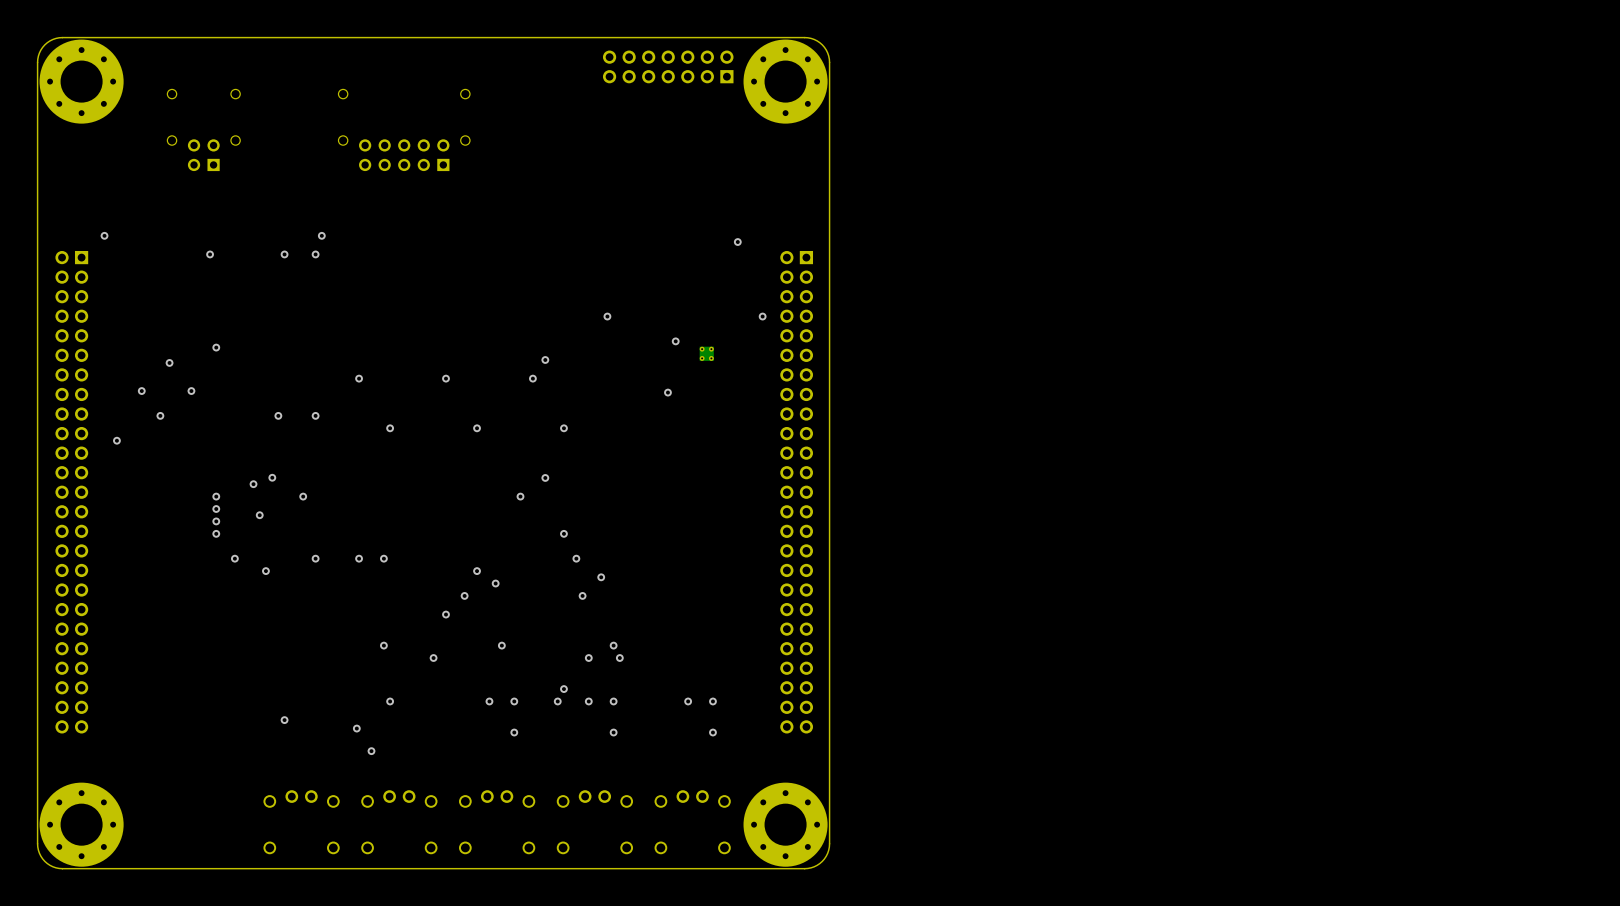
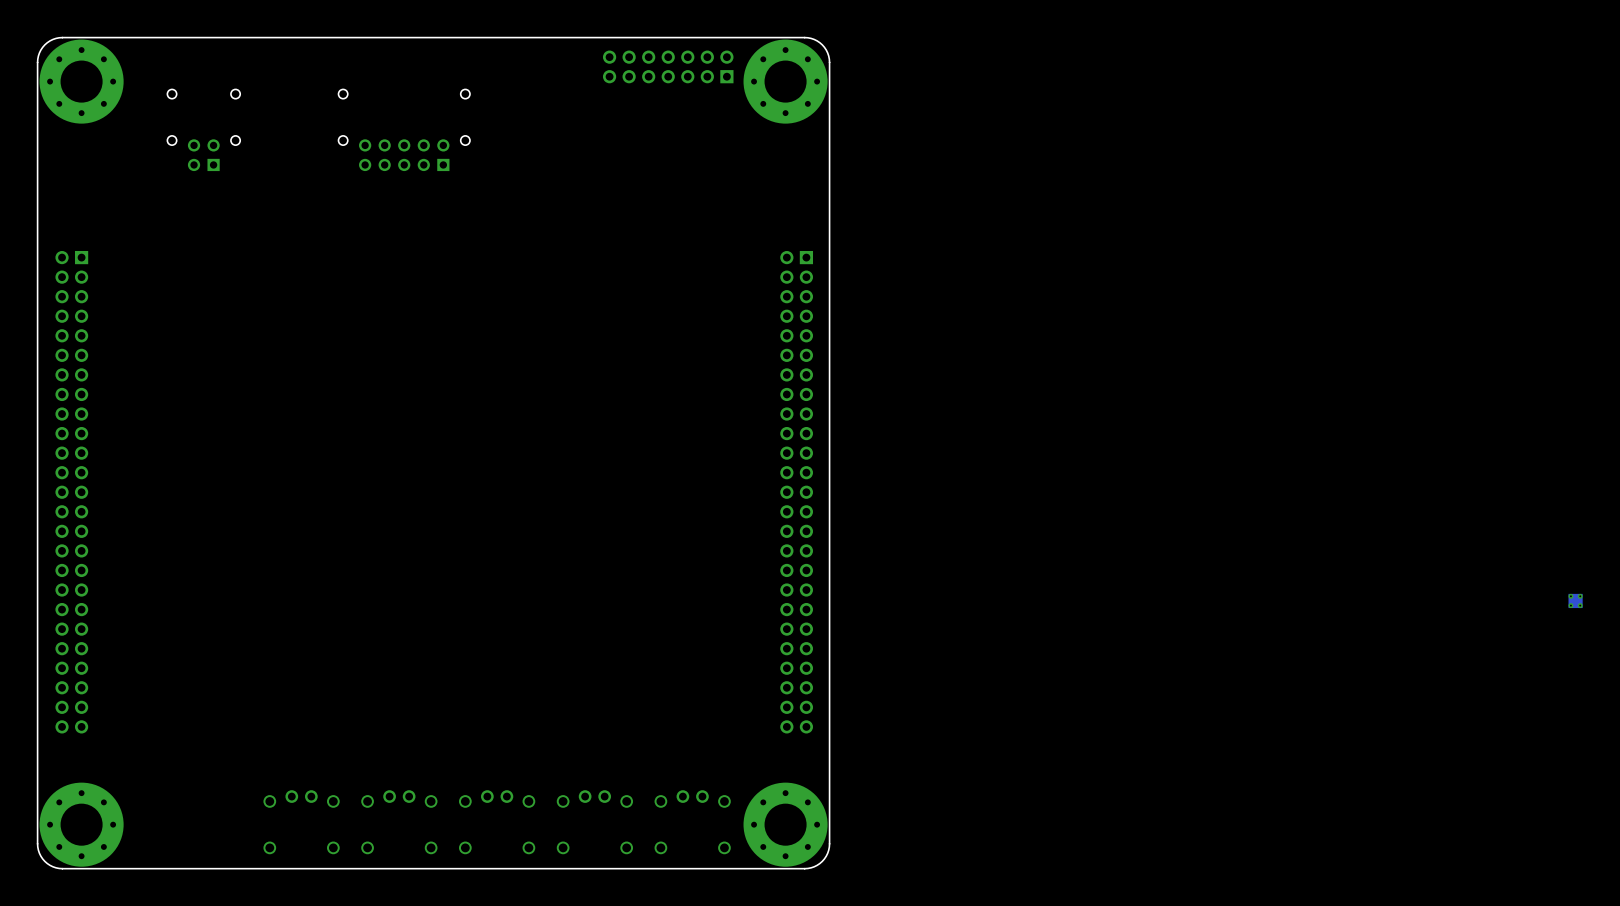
via: (104, 235) -> none
via: (321, 235) -> none
via: (737, 242) -> none
via: (210, 254) -> none
via: (284, 254) -> none
via: (315, 254) -> none
via: (607, 316) -> none
via: (762, 316) -> none
via: (675, 341) -> none
via: (216, 347) -> none
part: (706, 353) -> none
via: (545, 360) -> none
via: (169, 362) -> none
via: (359, 378) -> none
via: (445, 378) -> none
via: (532, 378) -> none
via: (141, 391) -> none
via: (191, 391) -> none
via: (667, 392) -> none
via: (160, 415) -> none
via: (278, 415) -> none
via: (315, 415) -> none
via: (390, 428) -> none
via: (477, 428) -> none
via: (563, 428) -> none
via: (116, 440) -> none
via: (272, 477) -> none
via: (545, 477) -> none
via: (253, 484) -> none
via: (216, 496) -> none
via: (303, 496) -> none
via: (520, 496) -> none
via: (216, 509) -> none
via: (259, 515) -> none
via: (216, 521) -> none
via: (216, 533) -> none
via: (563, 533) -> none
via: (234, 558) -> none
via: (315, 558) -> none
via: (359, 558) -> none
via: (383, 558) -> none
via: (576, 558) -> none
via: (265, 571) -> none
via: (477, 571) -> none
via: (601, 577) -> none
via: (495, 583) -> none
via: (464, 595) -> none
via: (582, 595) -> none
part: none -> (1575, 600)
via: (445, 614) -> none
via: (383, 645) -> none
via: (501, 645) -> none
via: (613, 645) -> none
via: (433, 658) -> none
via: (588, 658) -> none
via: (619, 658) -> none
via: (563, 689) -> none
via: (390, 701) -> none
via: (489, 701) -> none
via: (514, 701) -> none
via: (557, 701) -> none
via: (588, 701) -> none
via: (613, 701) -> none
via: (688, 701) -> none
via: (712, 701) -> none
via: (284, 720) -> none
via: (356, 728) -> none
via: (514, 732) -> none
via: (613, 732) -> none
via: (712, 732) -> none
via: (371, 751) -> none

